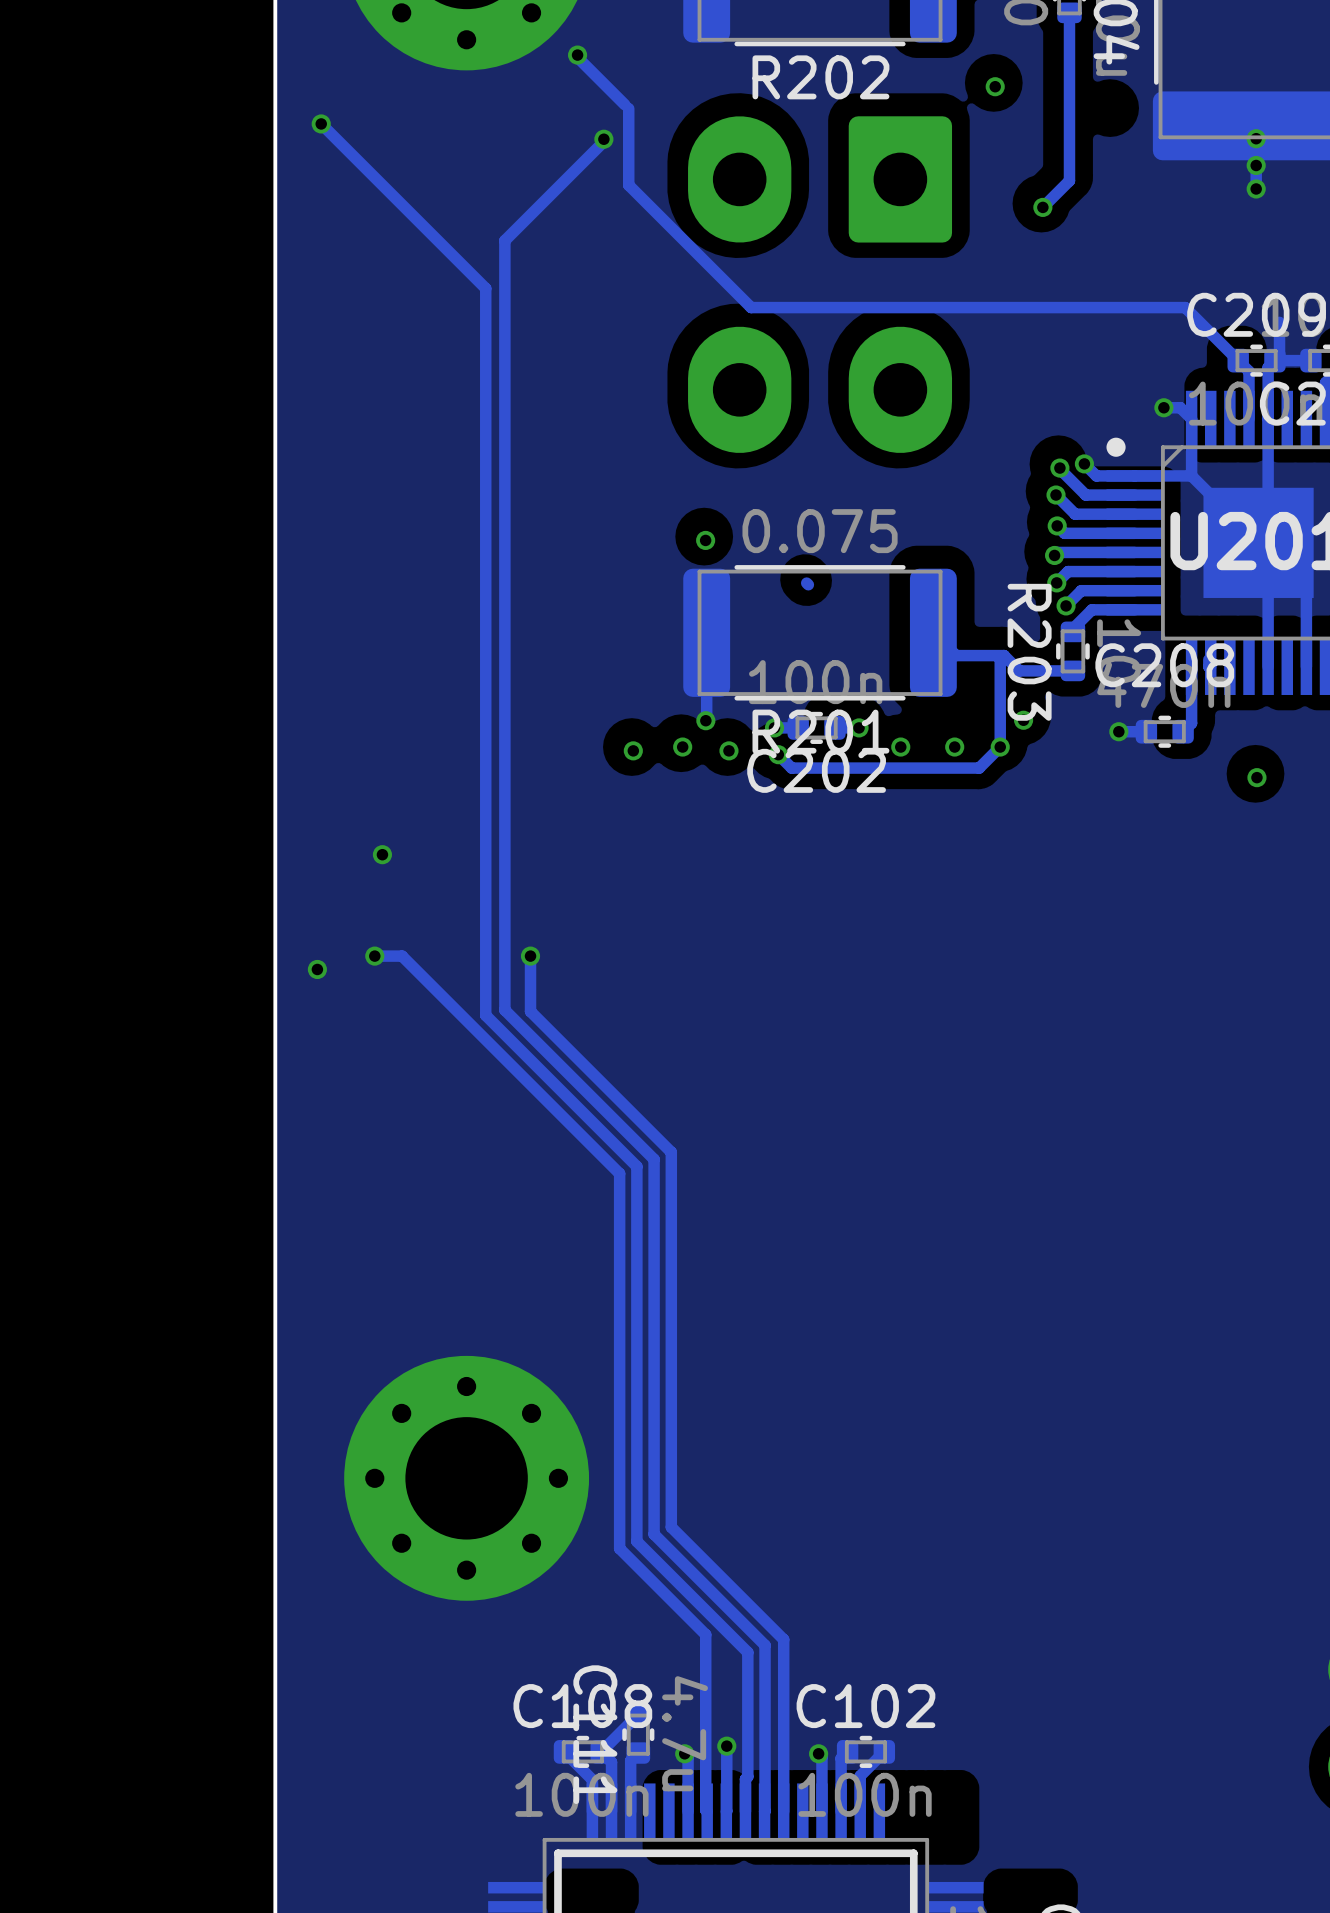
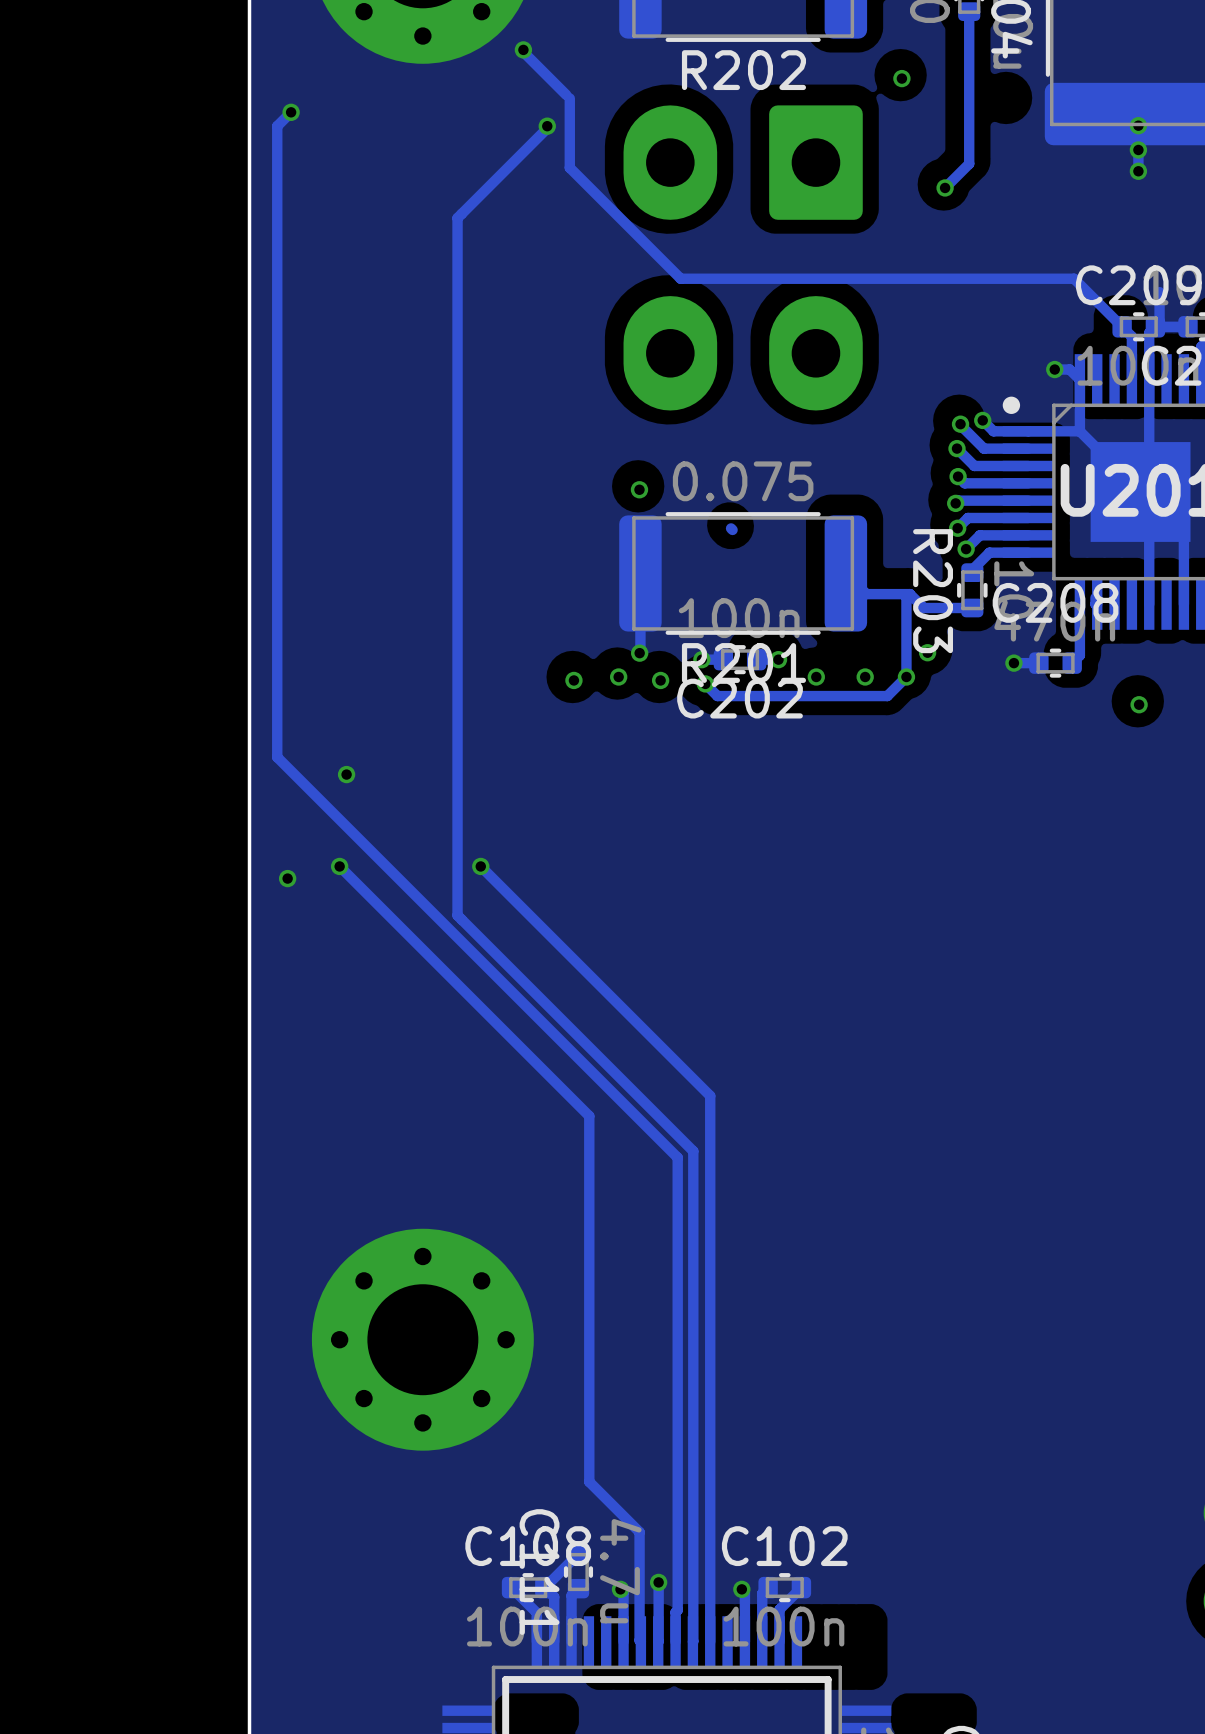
track: (321, 123) (485, 288) (485, 1015) -> (291, 112) (277, 126) (277, 757) (440, 920)
track: (374, 956) (402, 956) (619, 1173) (619, 1548) (705, 1634) (705, 1690) -> (339, 866) (589, 1116) (589, 1481) (639, 1532)
track: (530, 956) (530, 1011) (671, 1152) (671, 1527) (783, 1639) -> (480, 866) (710, 1095) (710, 1485)
track: (654, 1159) (654, 1534) (765, 1645) -> (592, 1050) (693, 1151) (693, 1491)
track: (636, 1166) (636, 1541) (747, 1652) -> (577, 1057) (677, 1157) (677, 1497)

